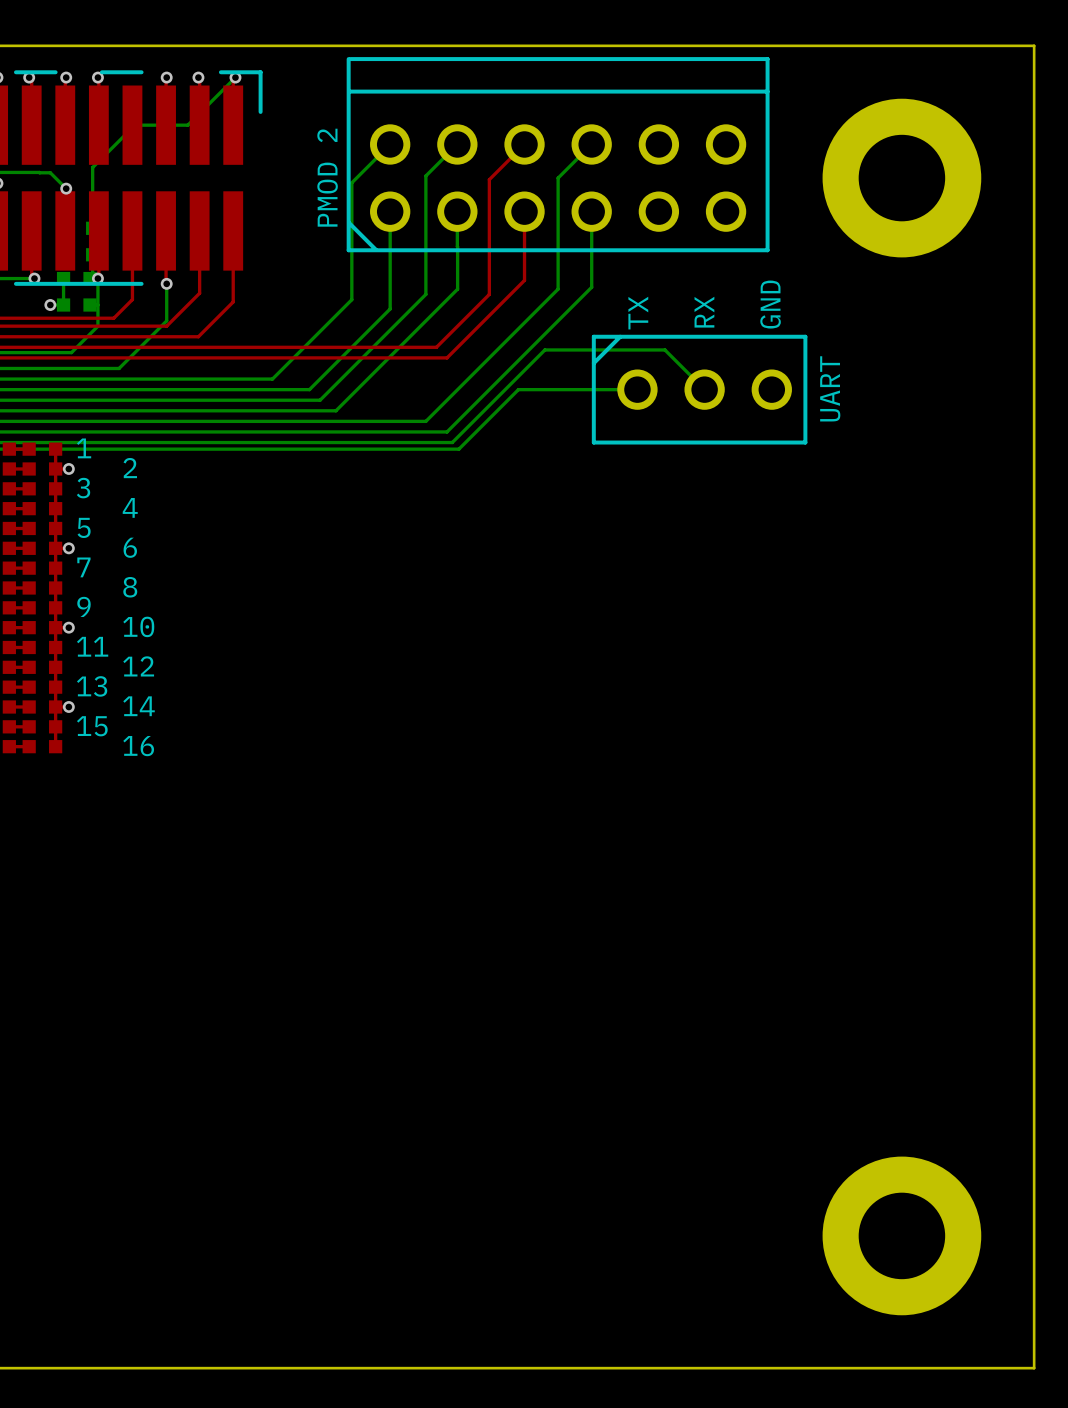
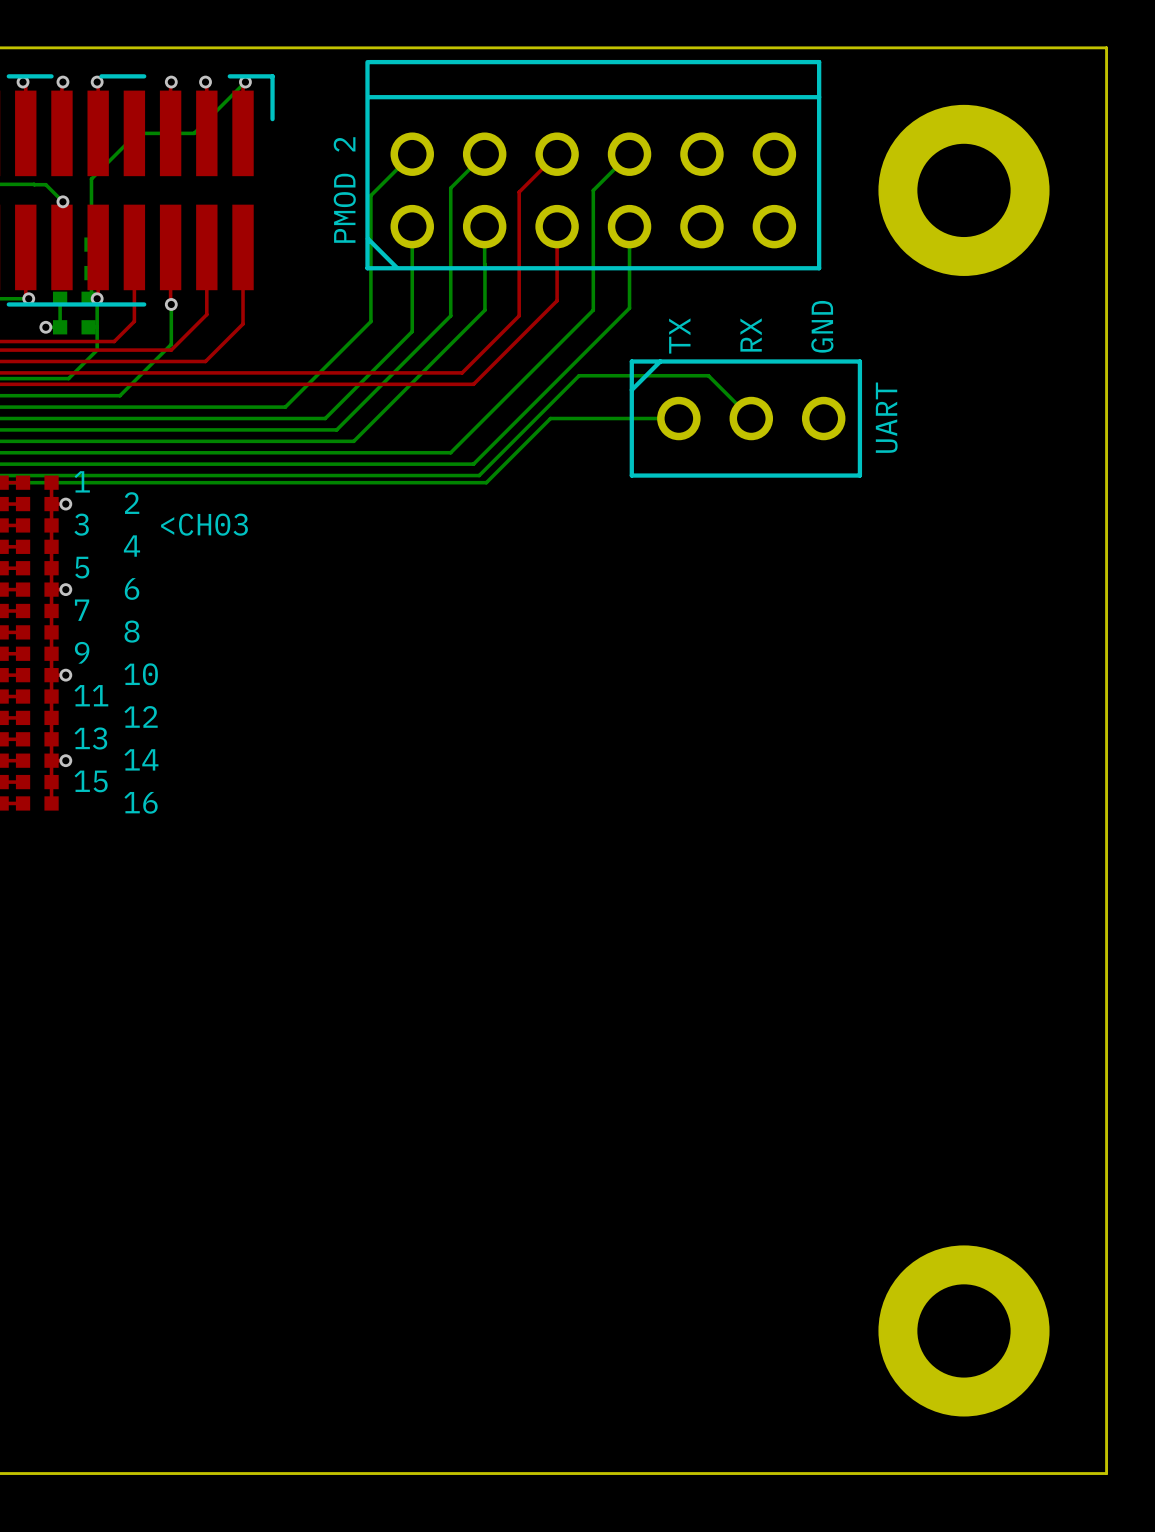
text: none -> <CH03 (204, 524)

